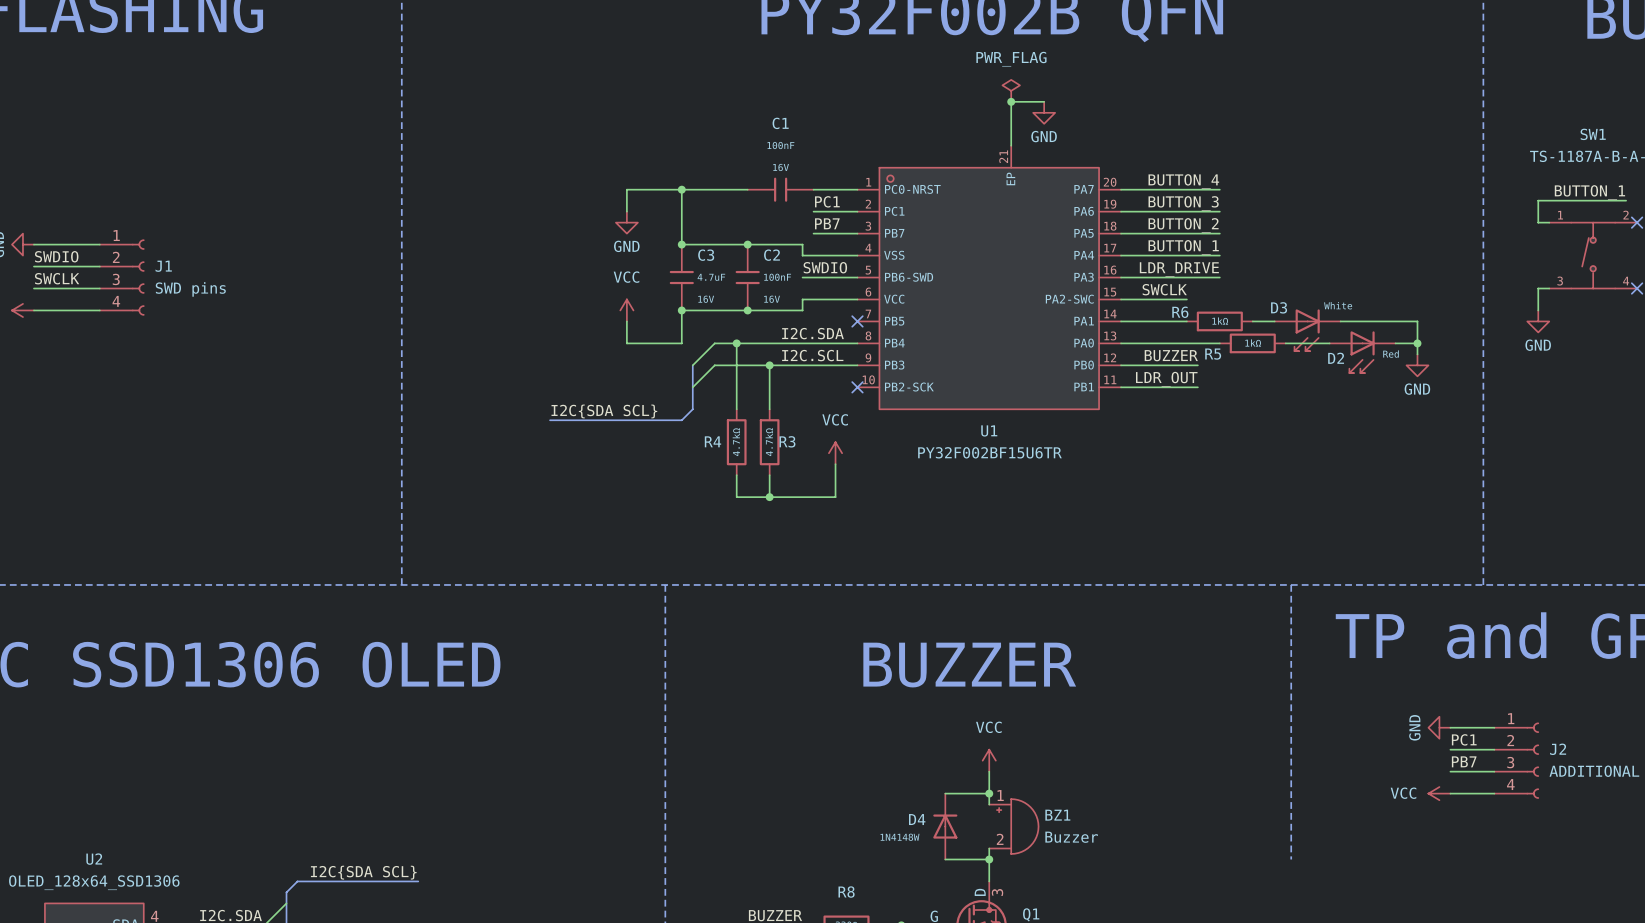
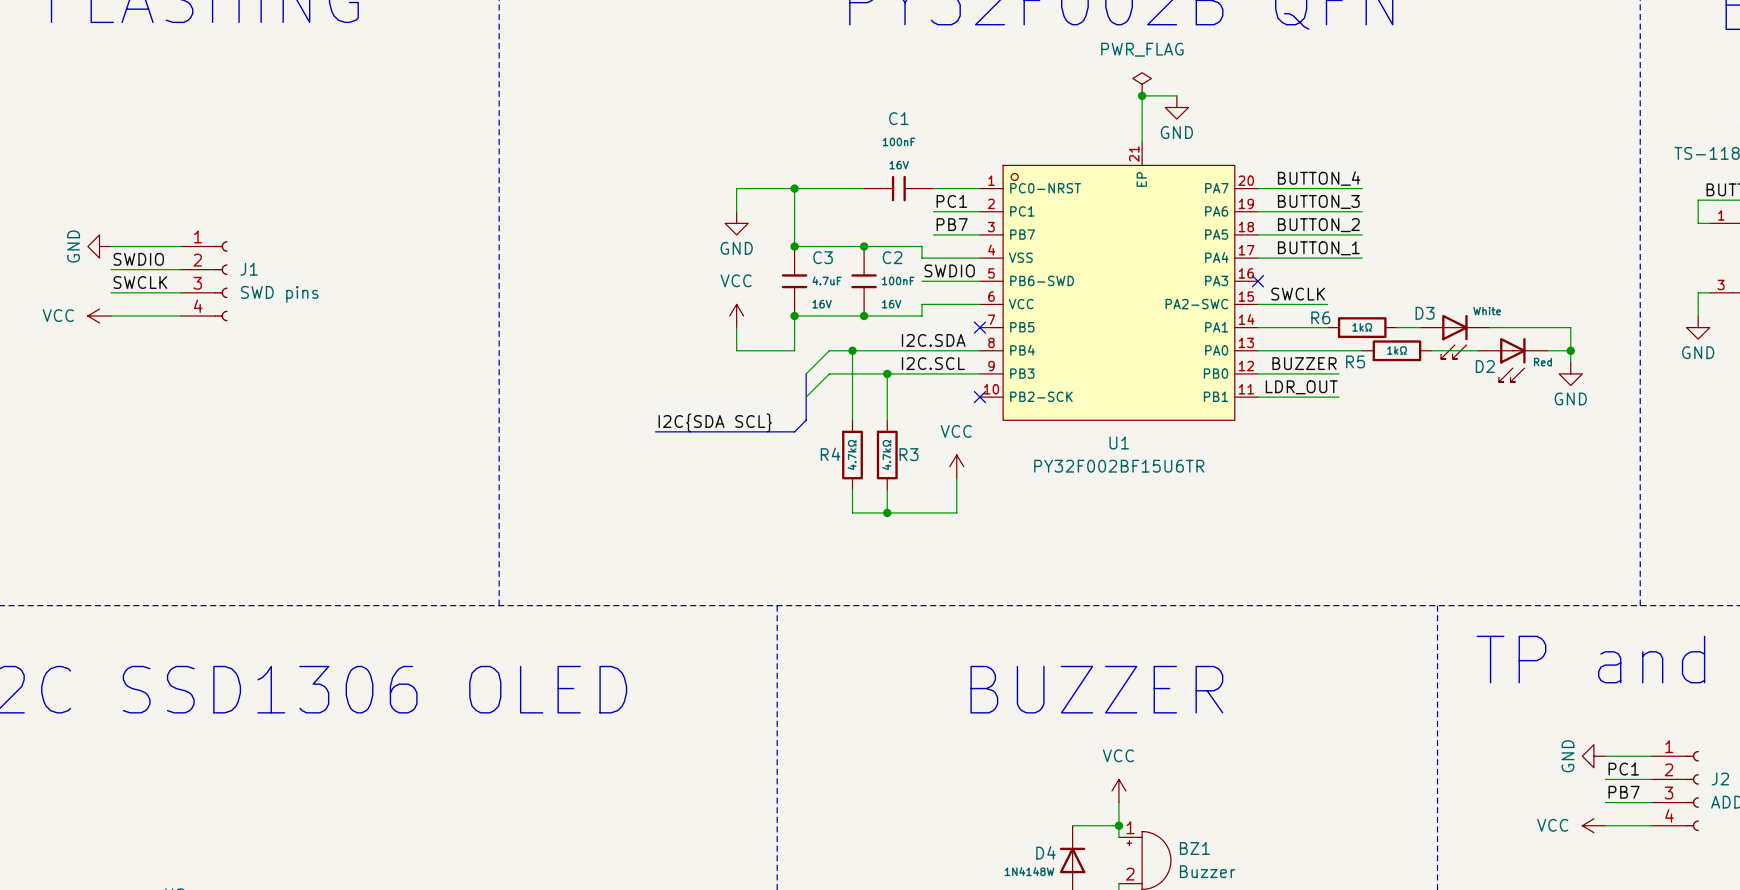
label: LDR_DRIVE (1179, 269) -> none
wire: (1121, 277) (1219, 277) -> none
no-connect mark: none -> (1257, 281)

